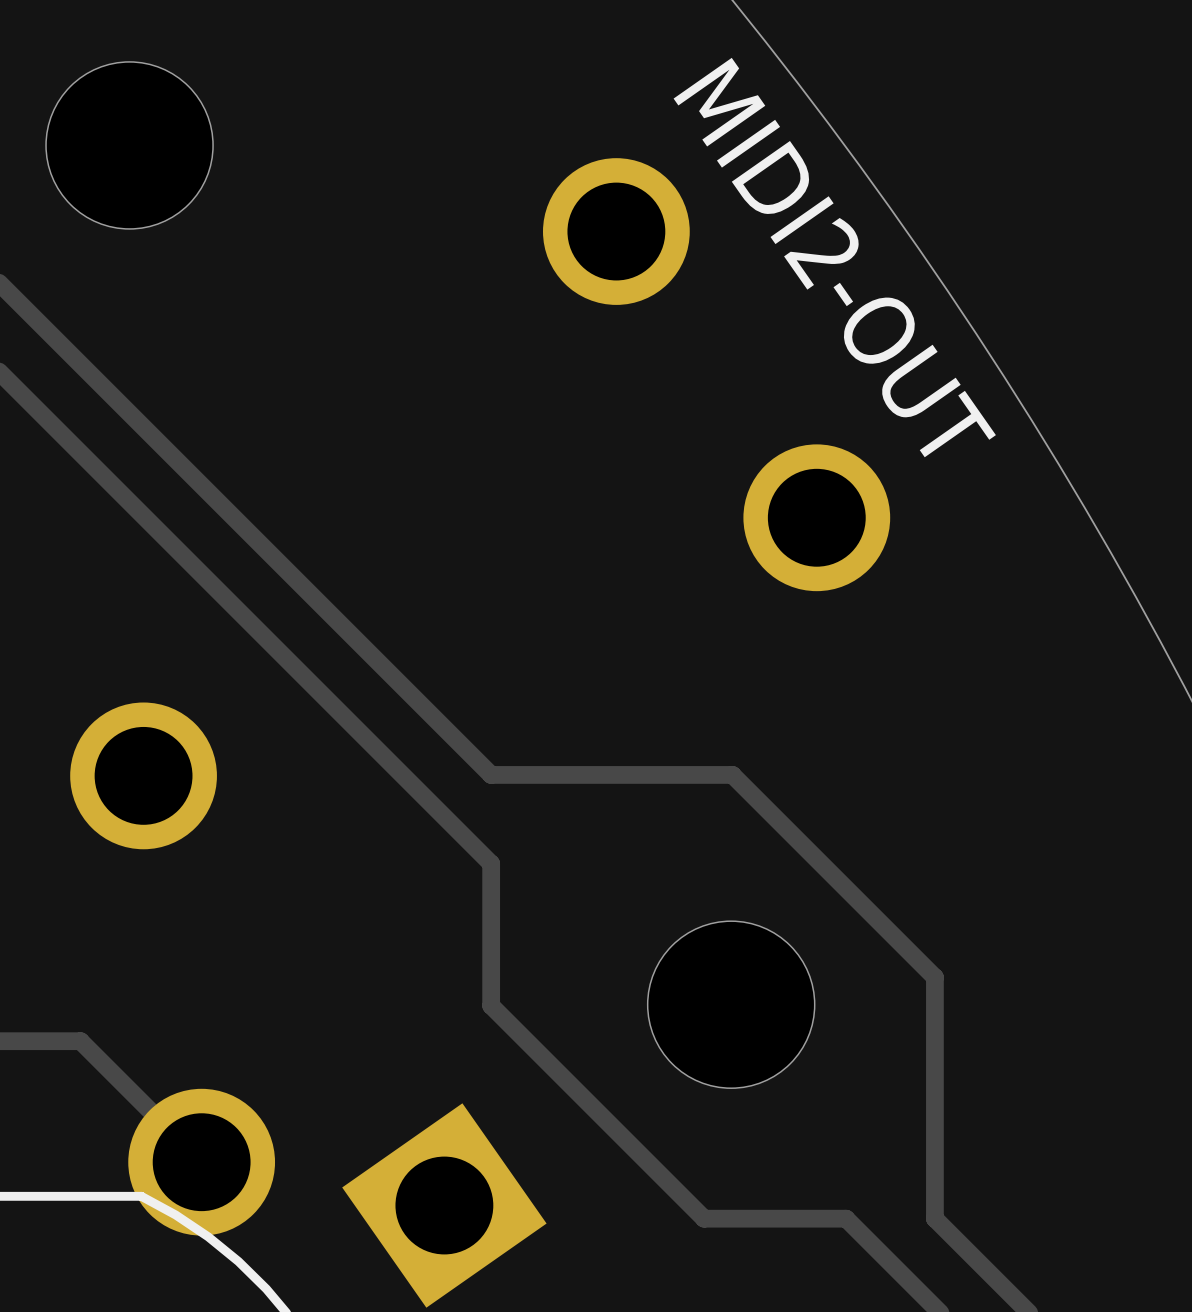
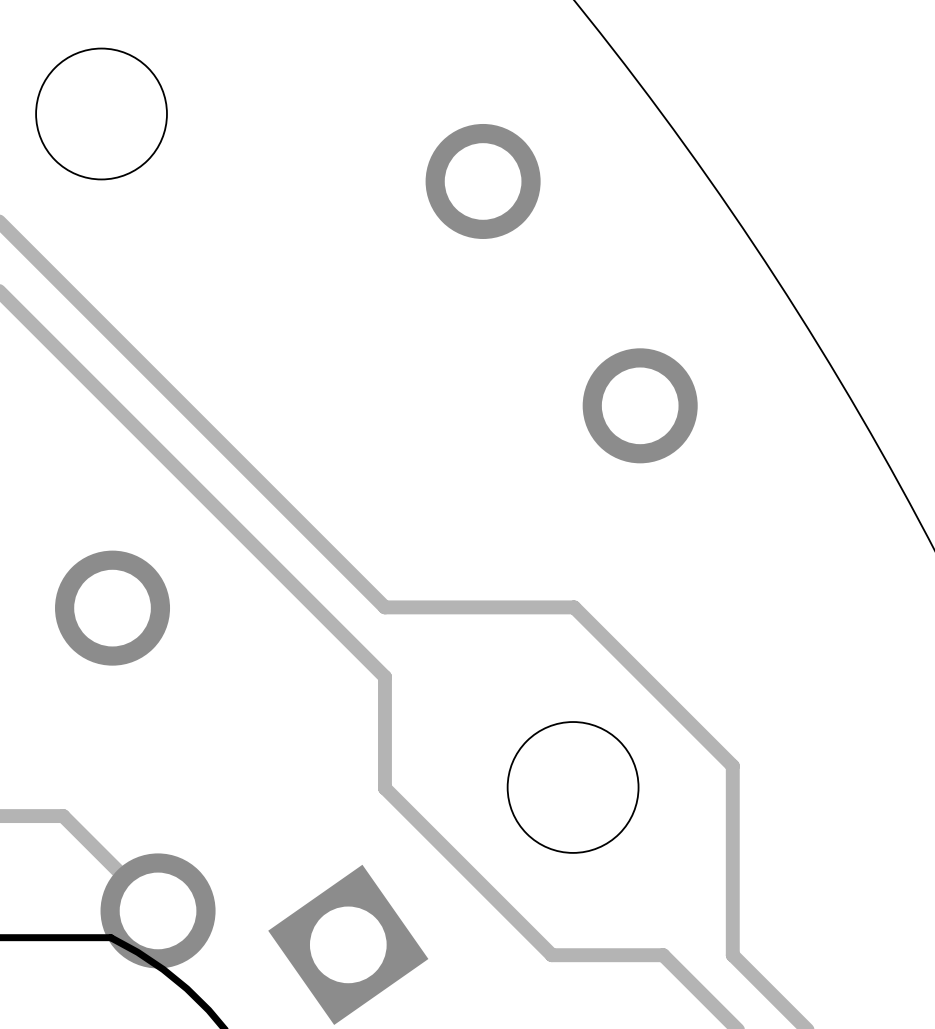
text: MIDI2-OUT (834, 257) -> none

